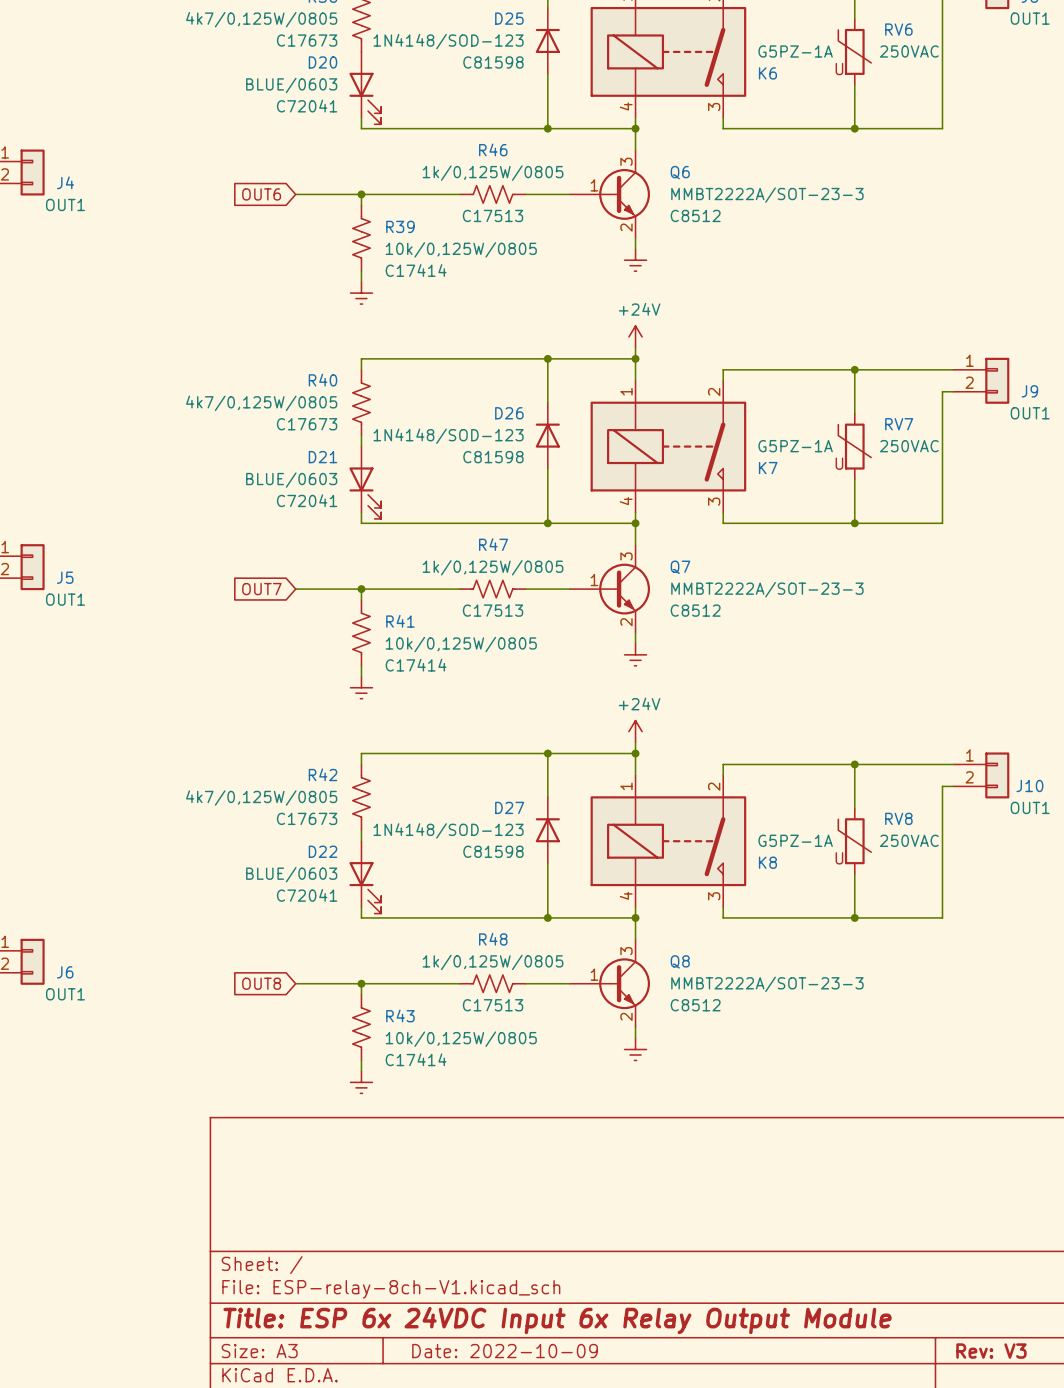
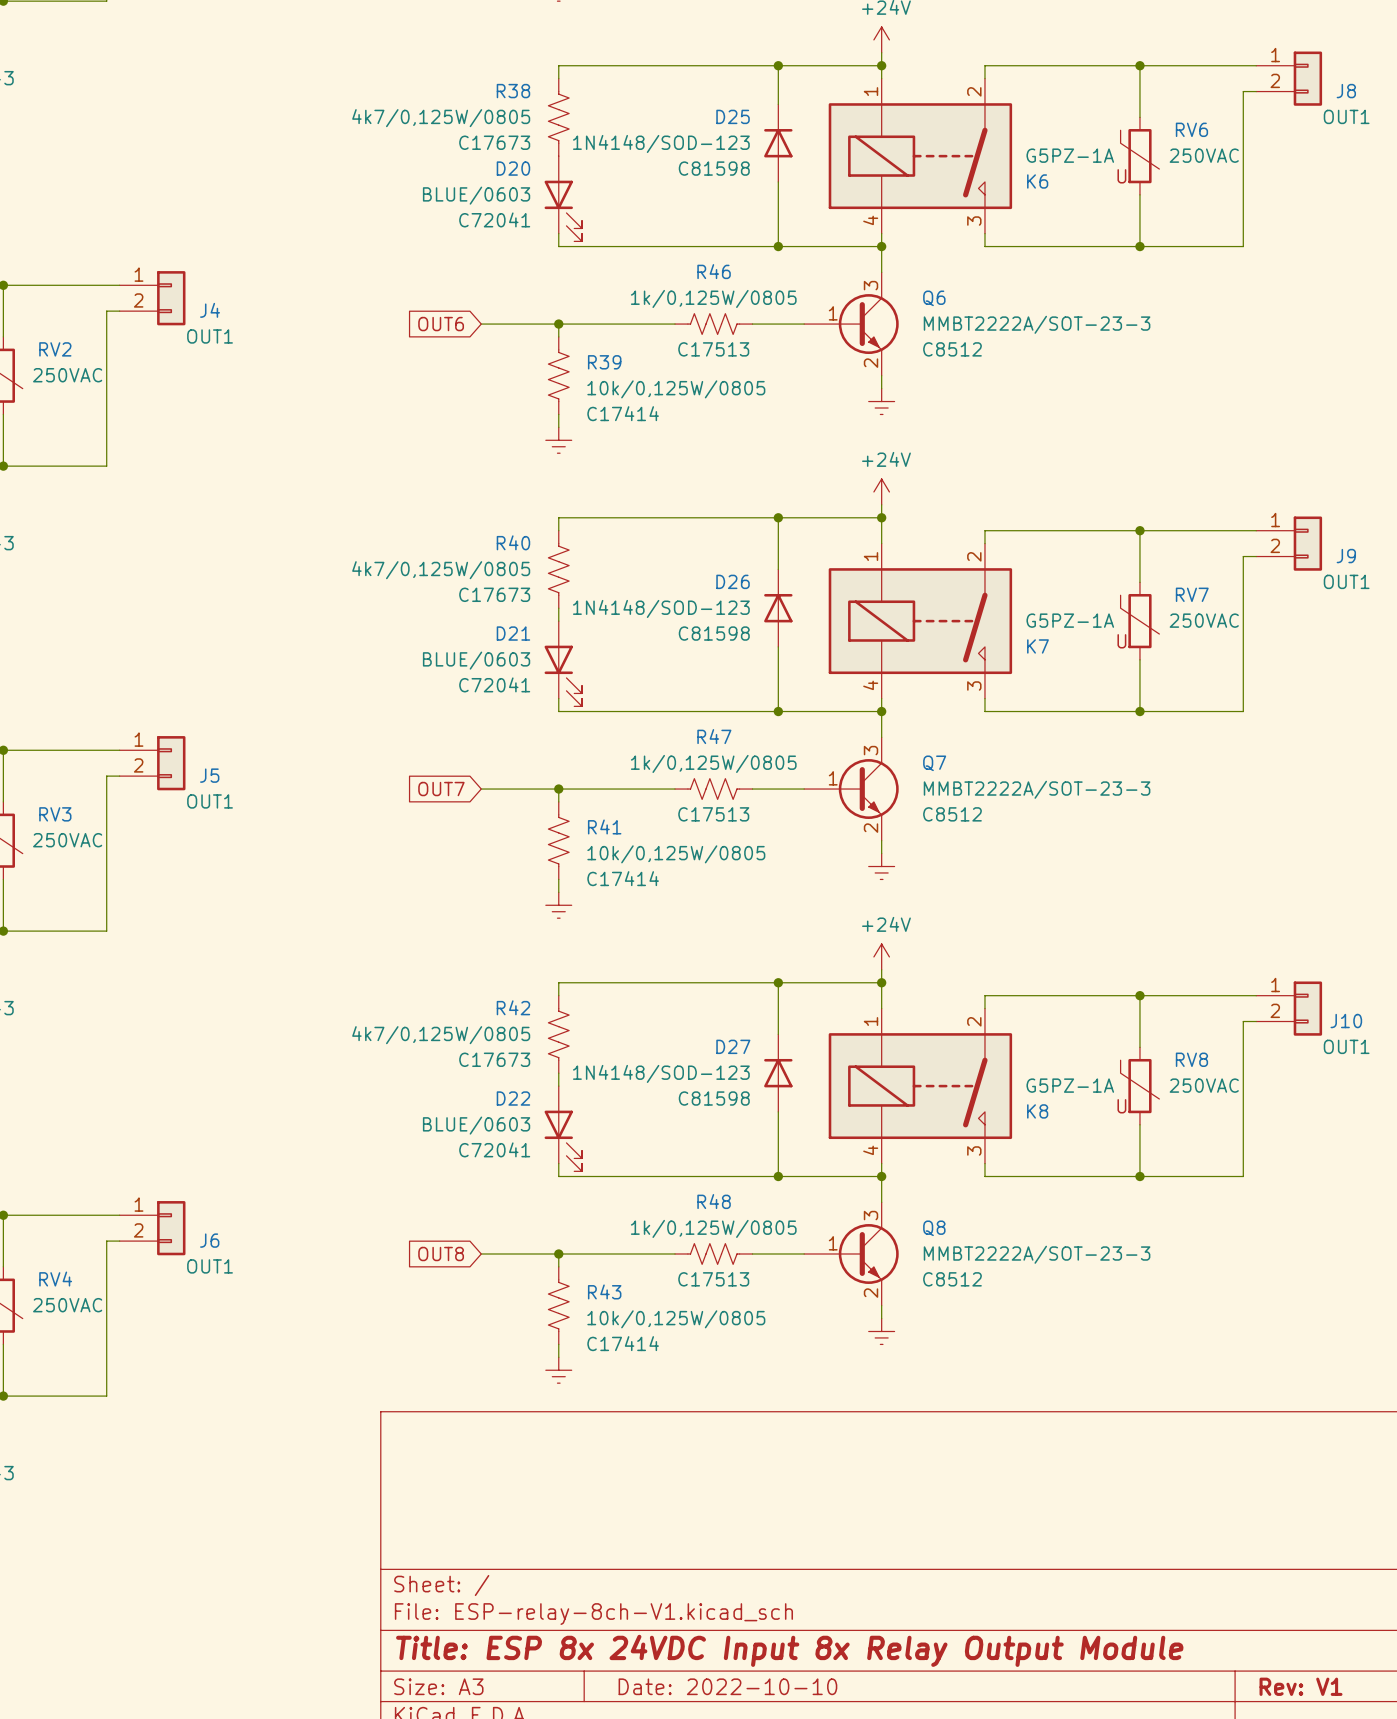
title block: Title: ESP 6x 24VDC Input 6x Relay Output Module (557, 1320) -> Title: ESP 8x 24VDC Input 8x Relay Output Module (789, 1650)
title block: Date: 2022-10-09 (505, 1351) -> Date: 2022-10-10 (727, 1686)
title block: Rev: V3 (991, 1351) -> Rev: V1 (1301, 1686)

